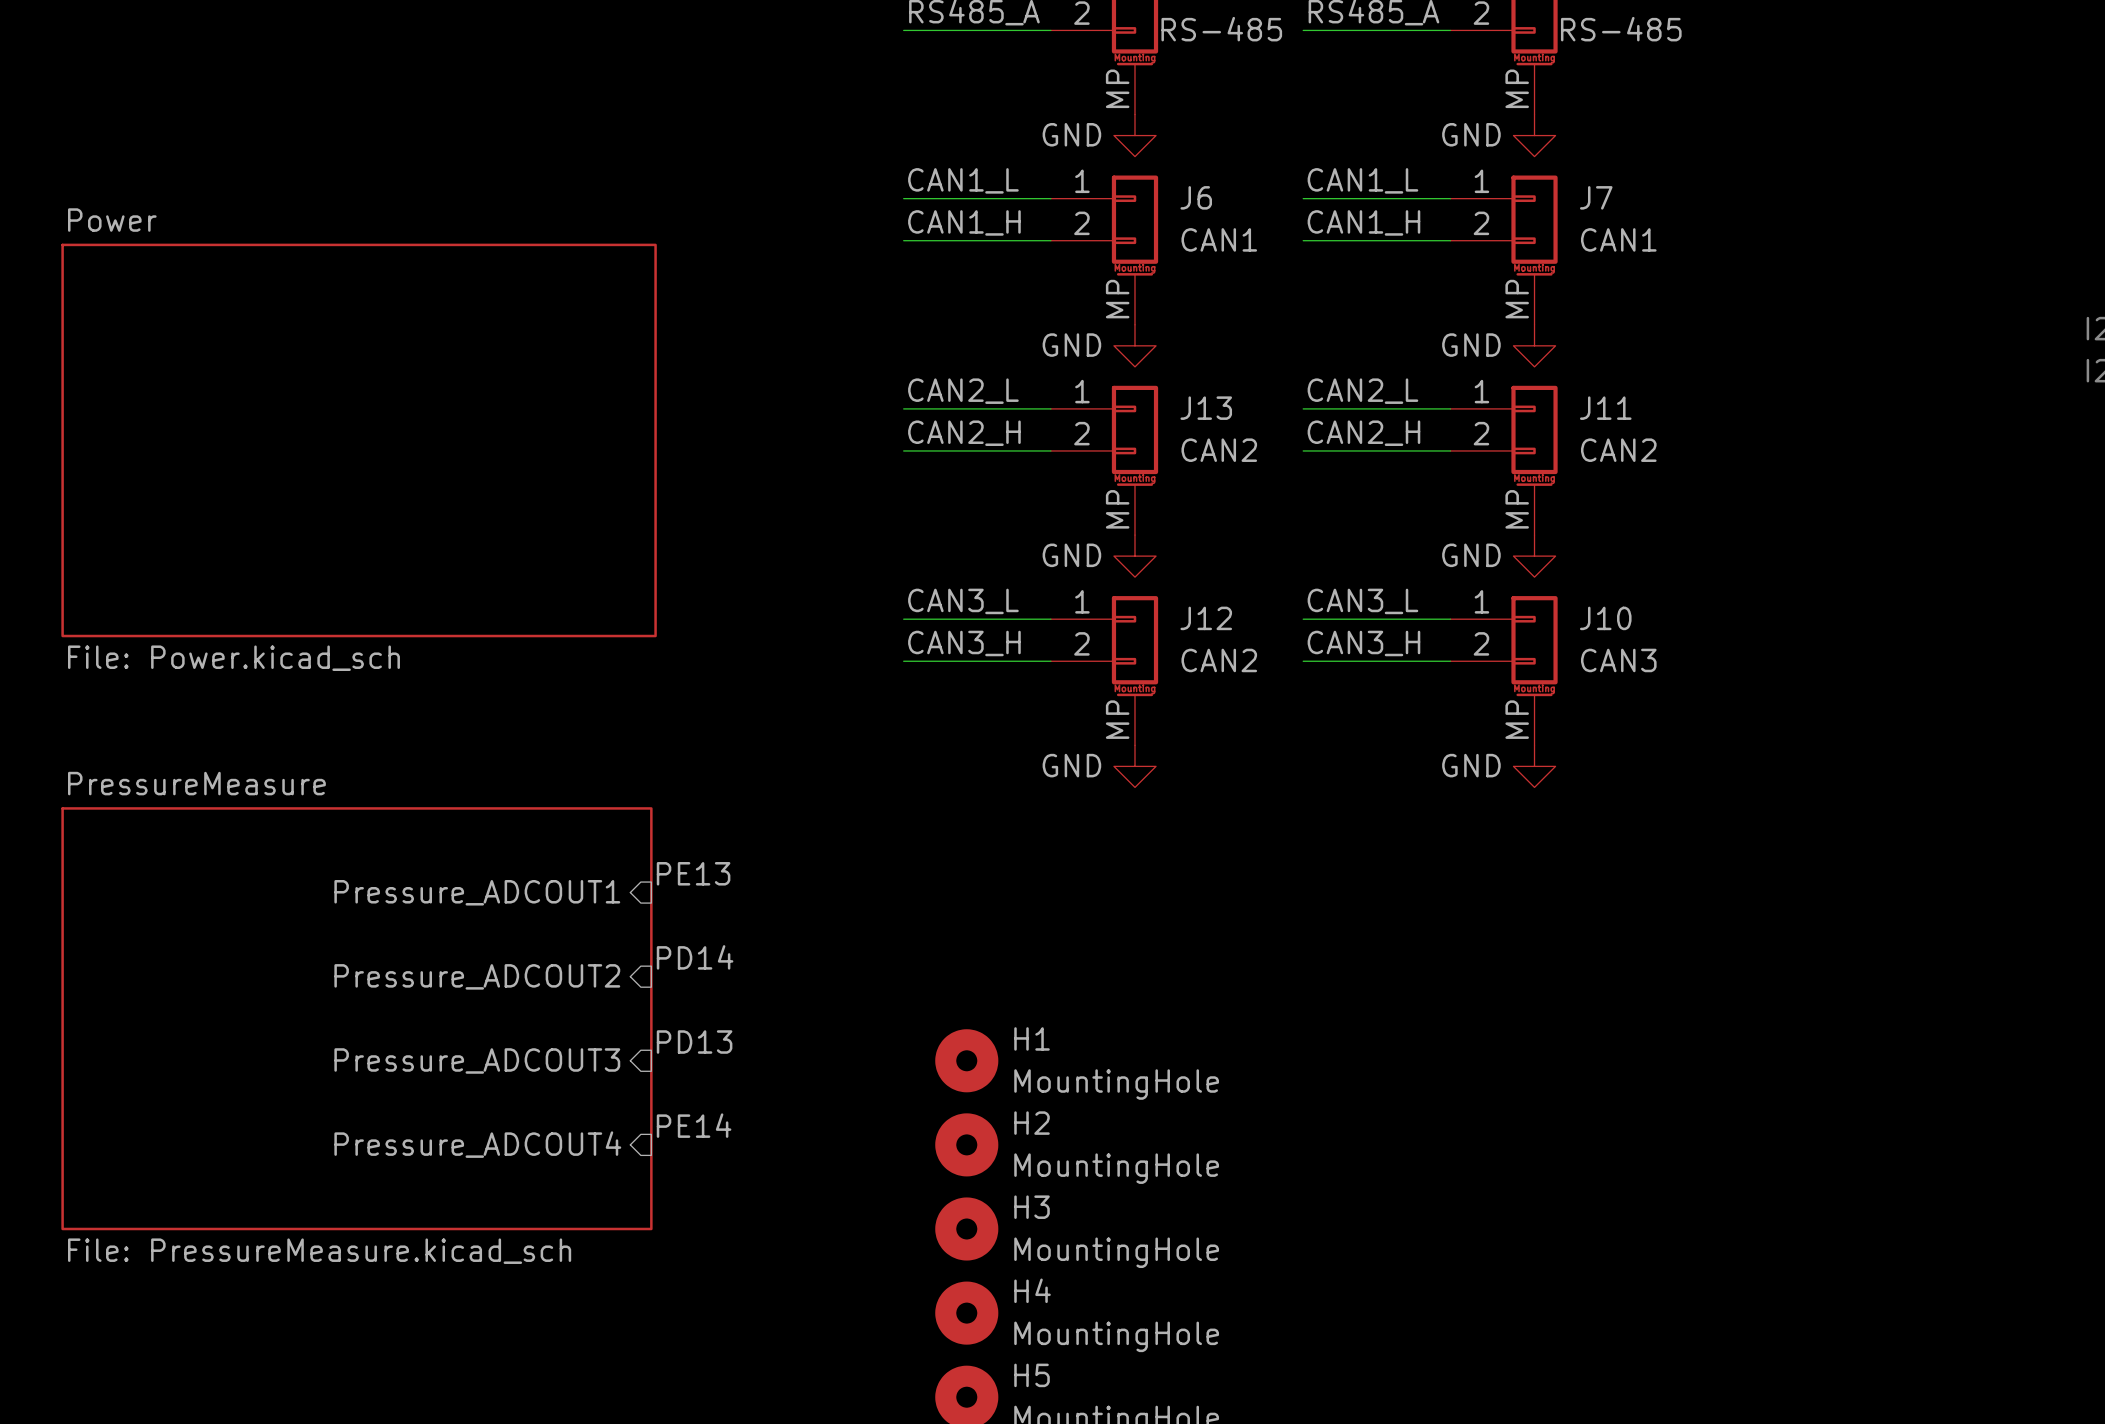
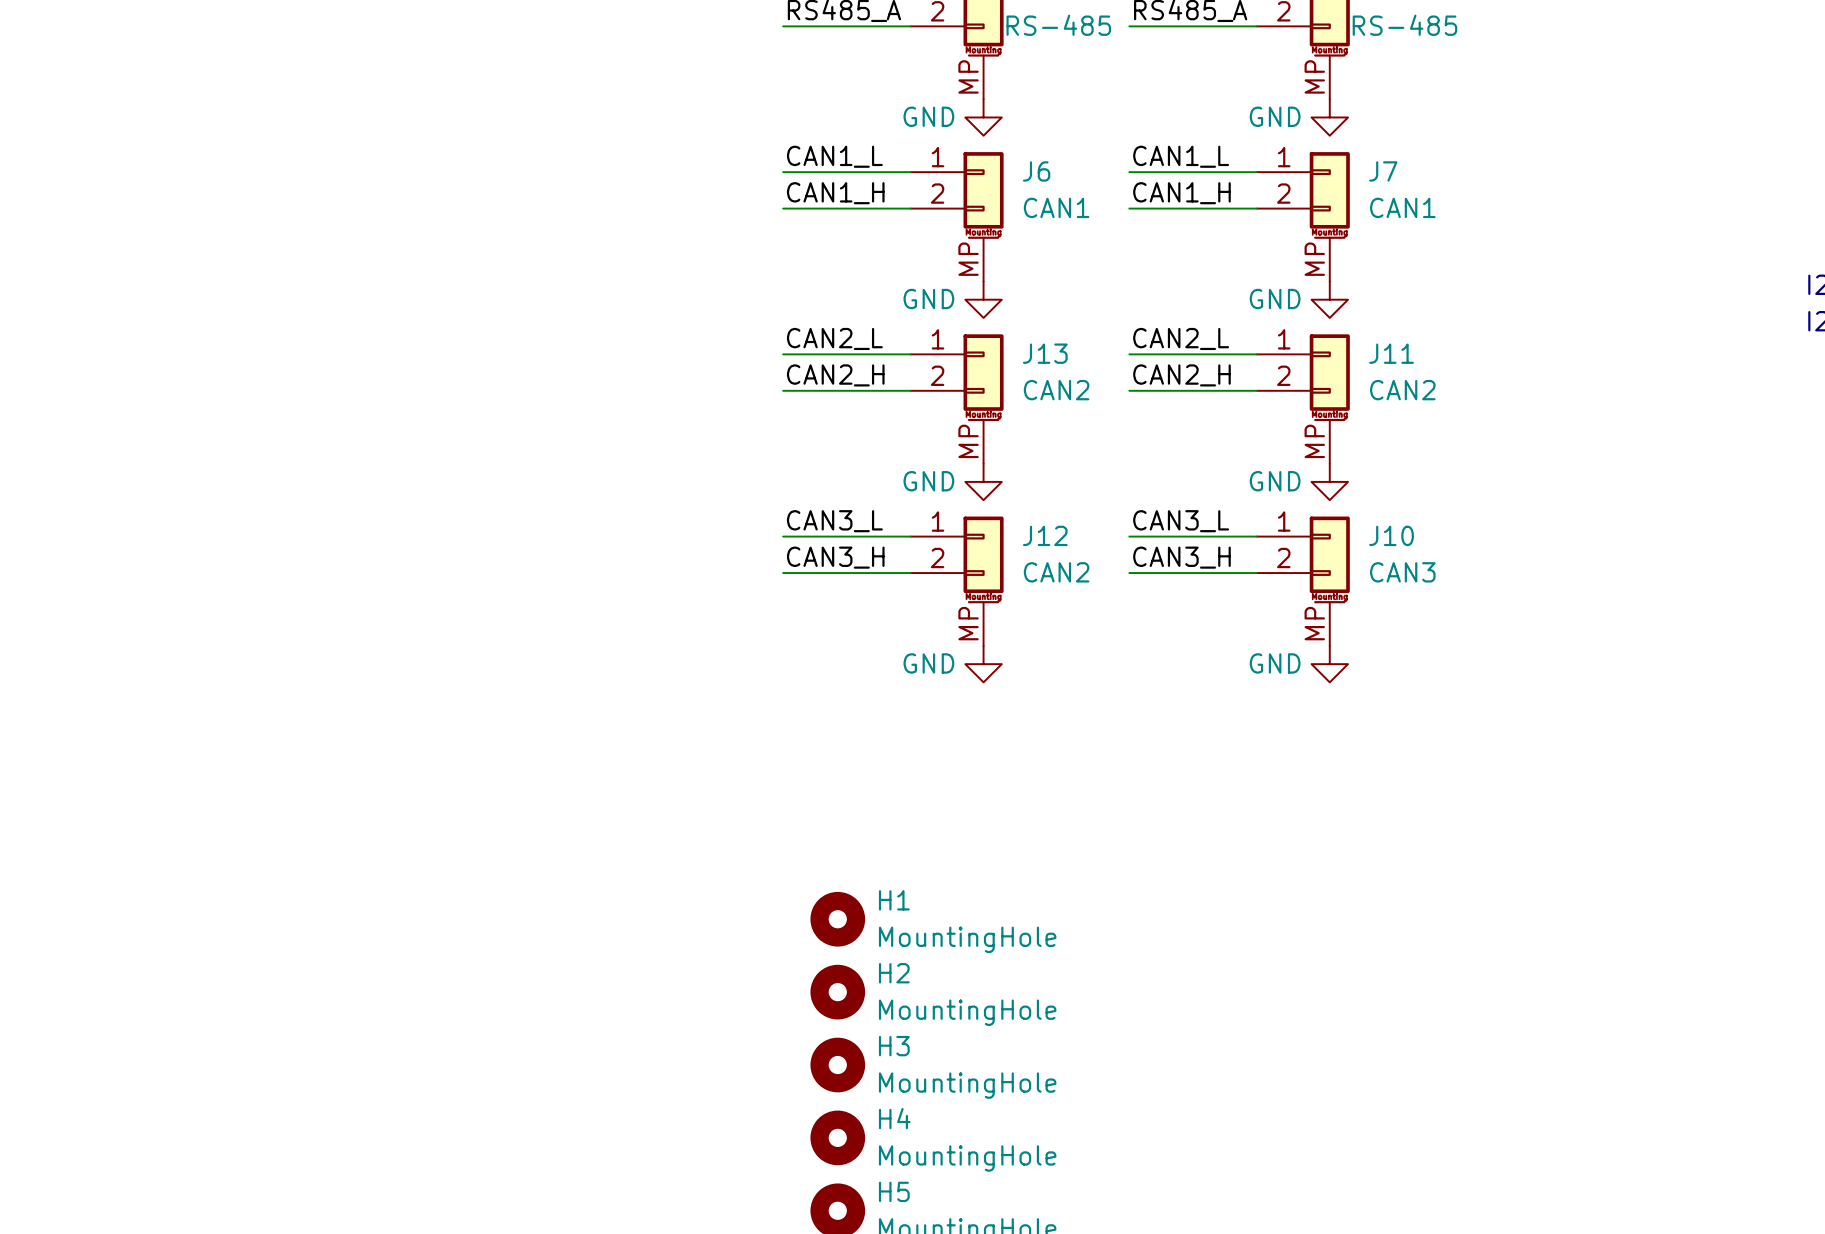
sheet Power: File: Power.kicad_sch (359, 440) -> none
label: PE13 (693, 873) -> none
sheet pin: Pressure_ADCOUT1 (477, 892) -> none
label: PD14 (695, 957) -> none
sheet pin: Pressure_ADCOUT2 (477, 976) -> none
sheet PressureMeasure: File: PressureMeasure.kicad_sch (356, 1018) -> none
label: PD13 (694, 1042) -> none
sheet pin: Pressure_ADCOUT3 (477, 1060) -> none
label: PE14 (694, 1125) -> none
sheet pin: Pressure_ADCOUT4 (477, 1144) -> none

